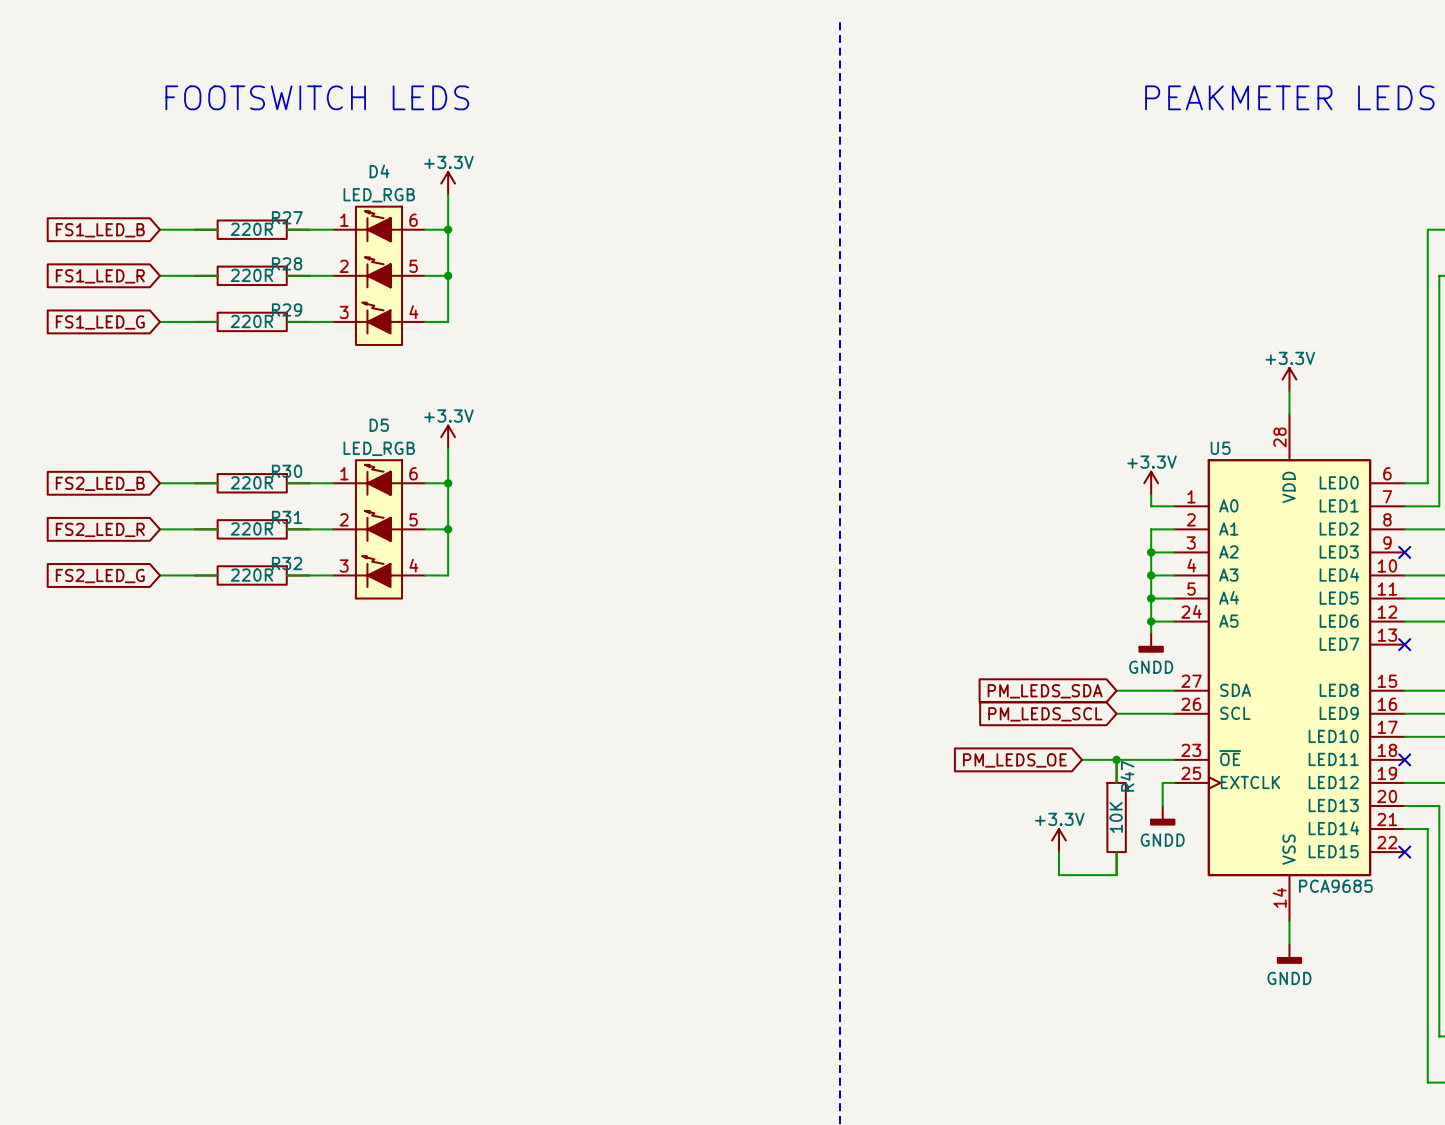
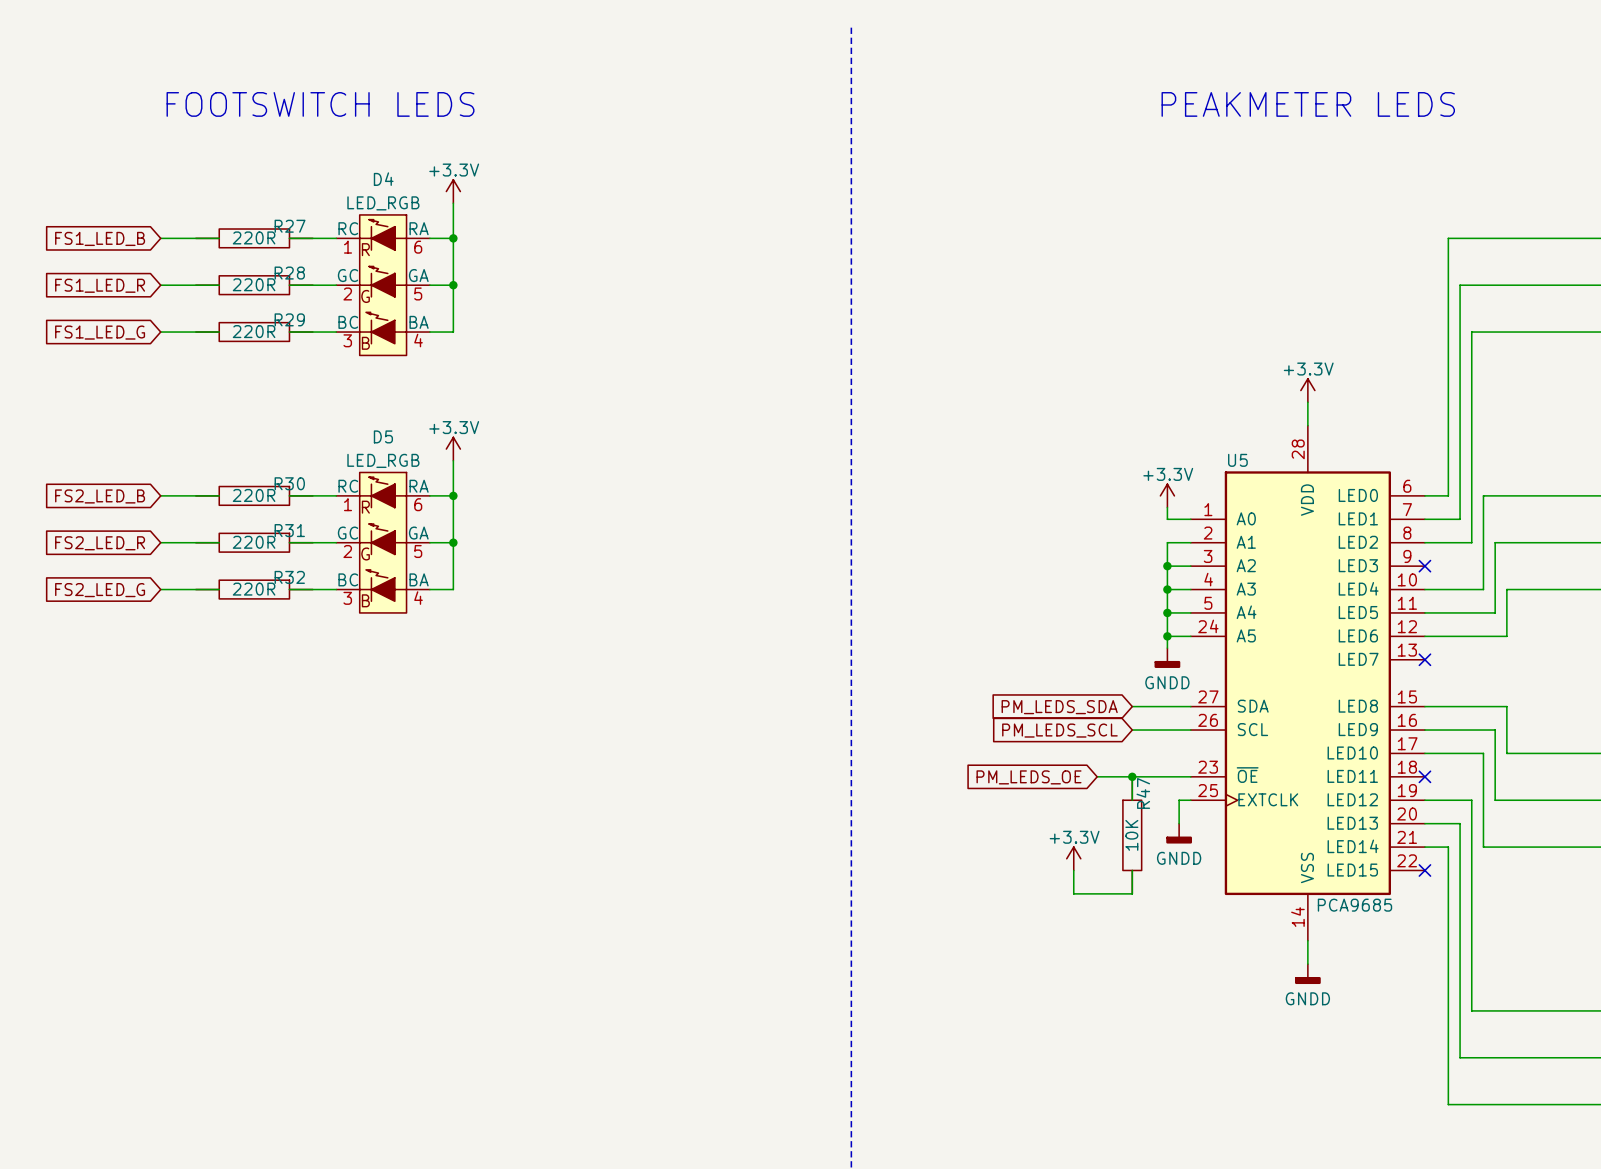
D4 symbol: [332, 206, 426, 345] -> [336, 214, 430, 356]
D5 symbol: [332, 460, 426, 599] -> [336, 472, 430, 613]

